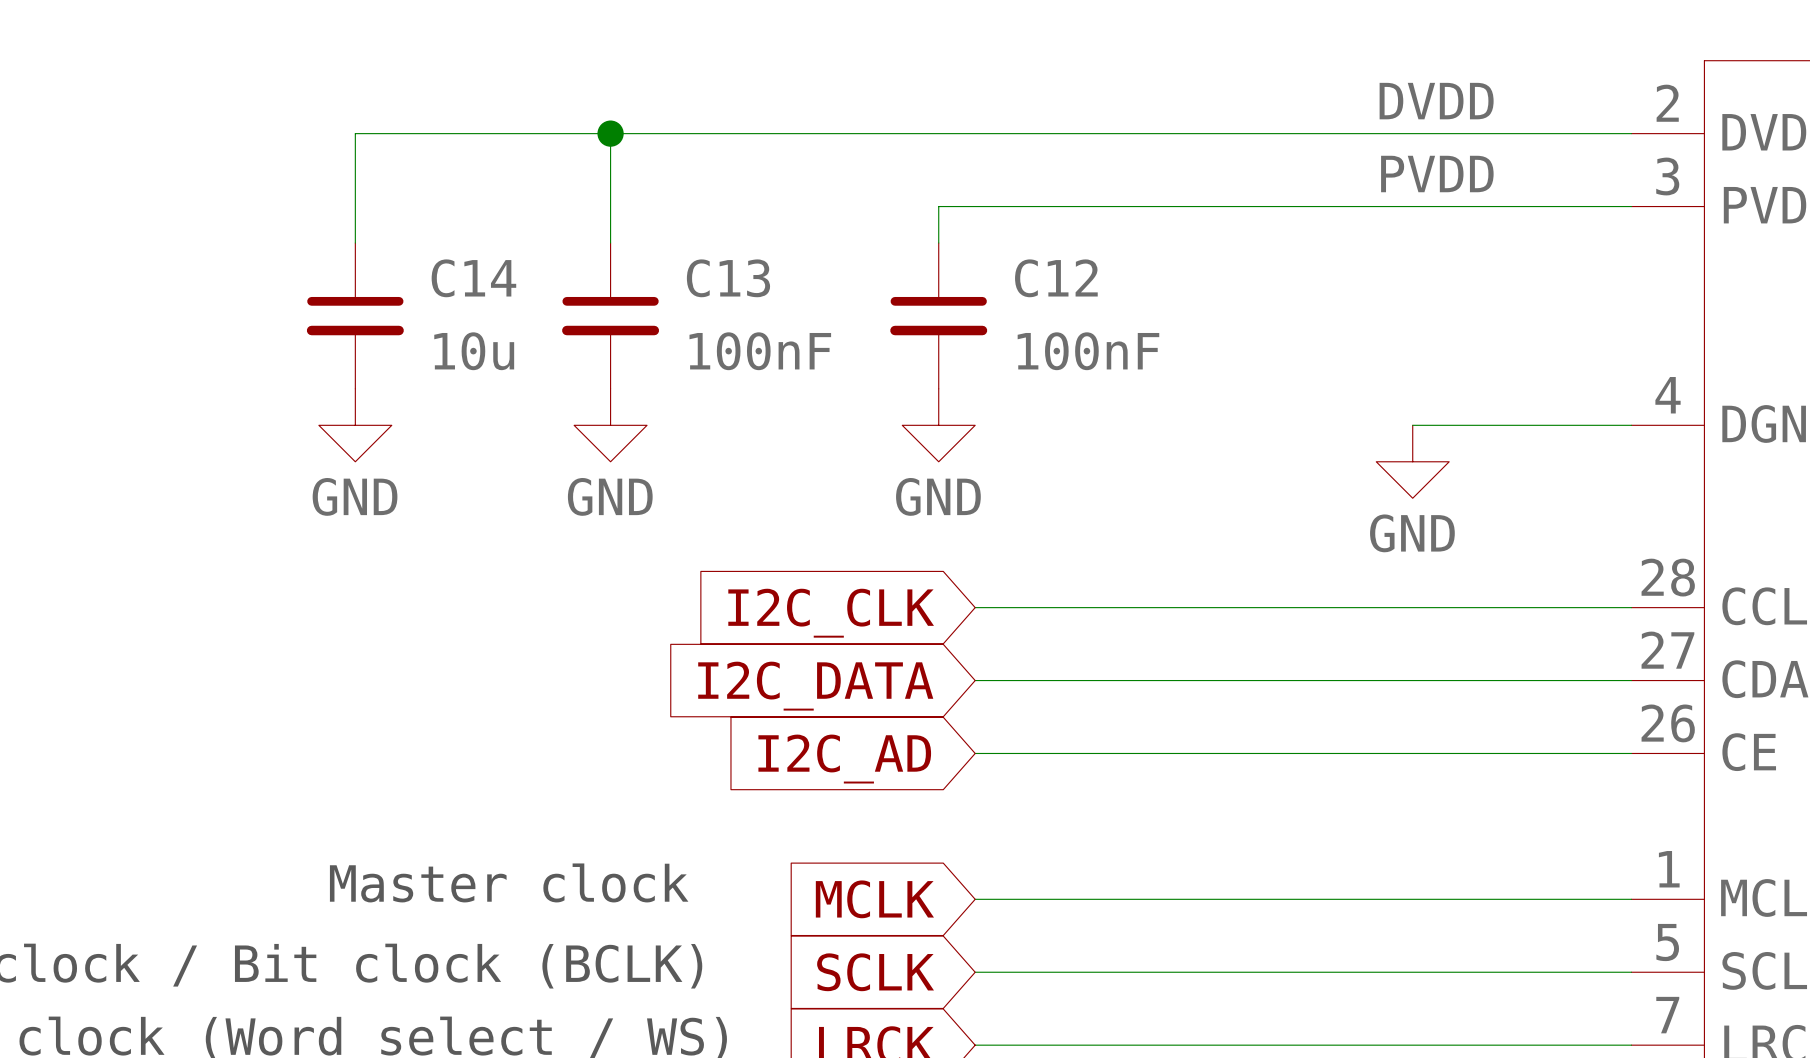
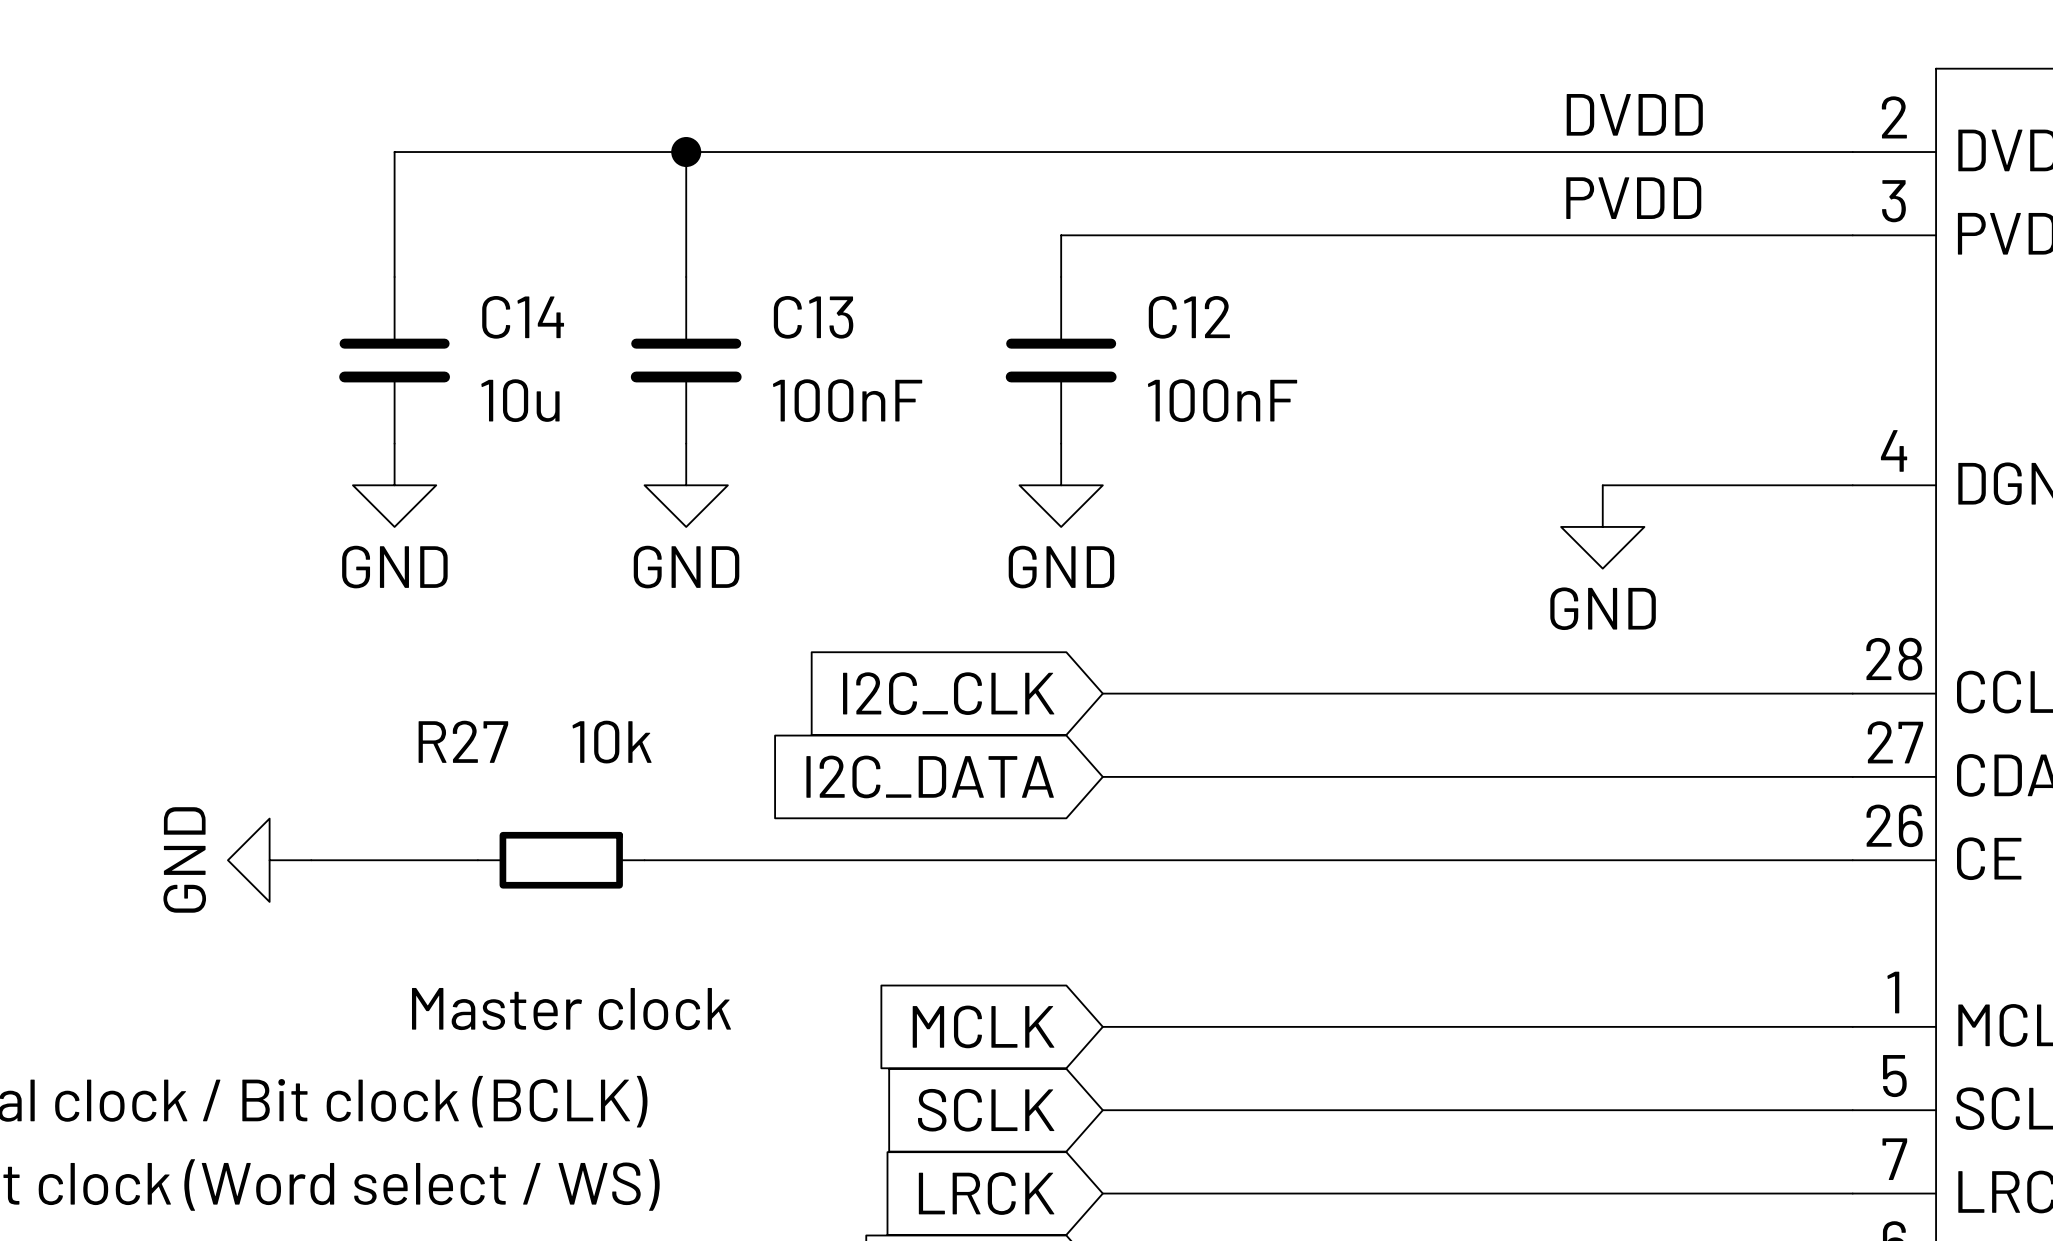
power symbol: none -> GND (269, 860)
wire: none -> (311, 860) (477, 860)
R27: none -> 10k (561, 860)
wire: none -> (644, 860) (1102, 860)
global label: I2C_AD (844, 759) -> none

